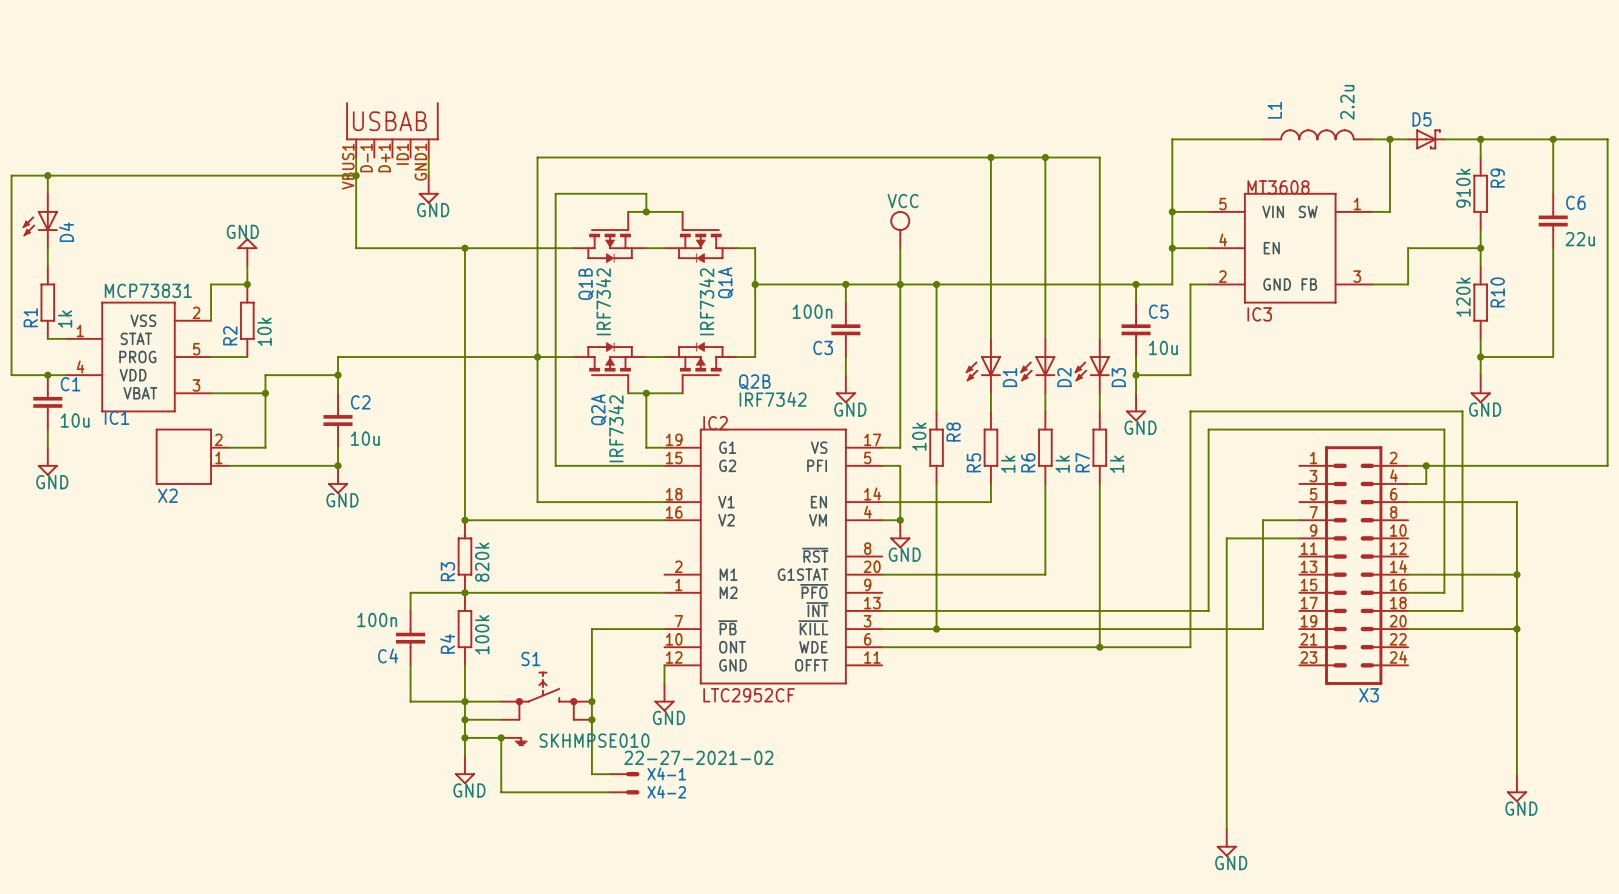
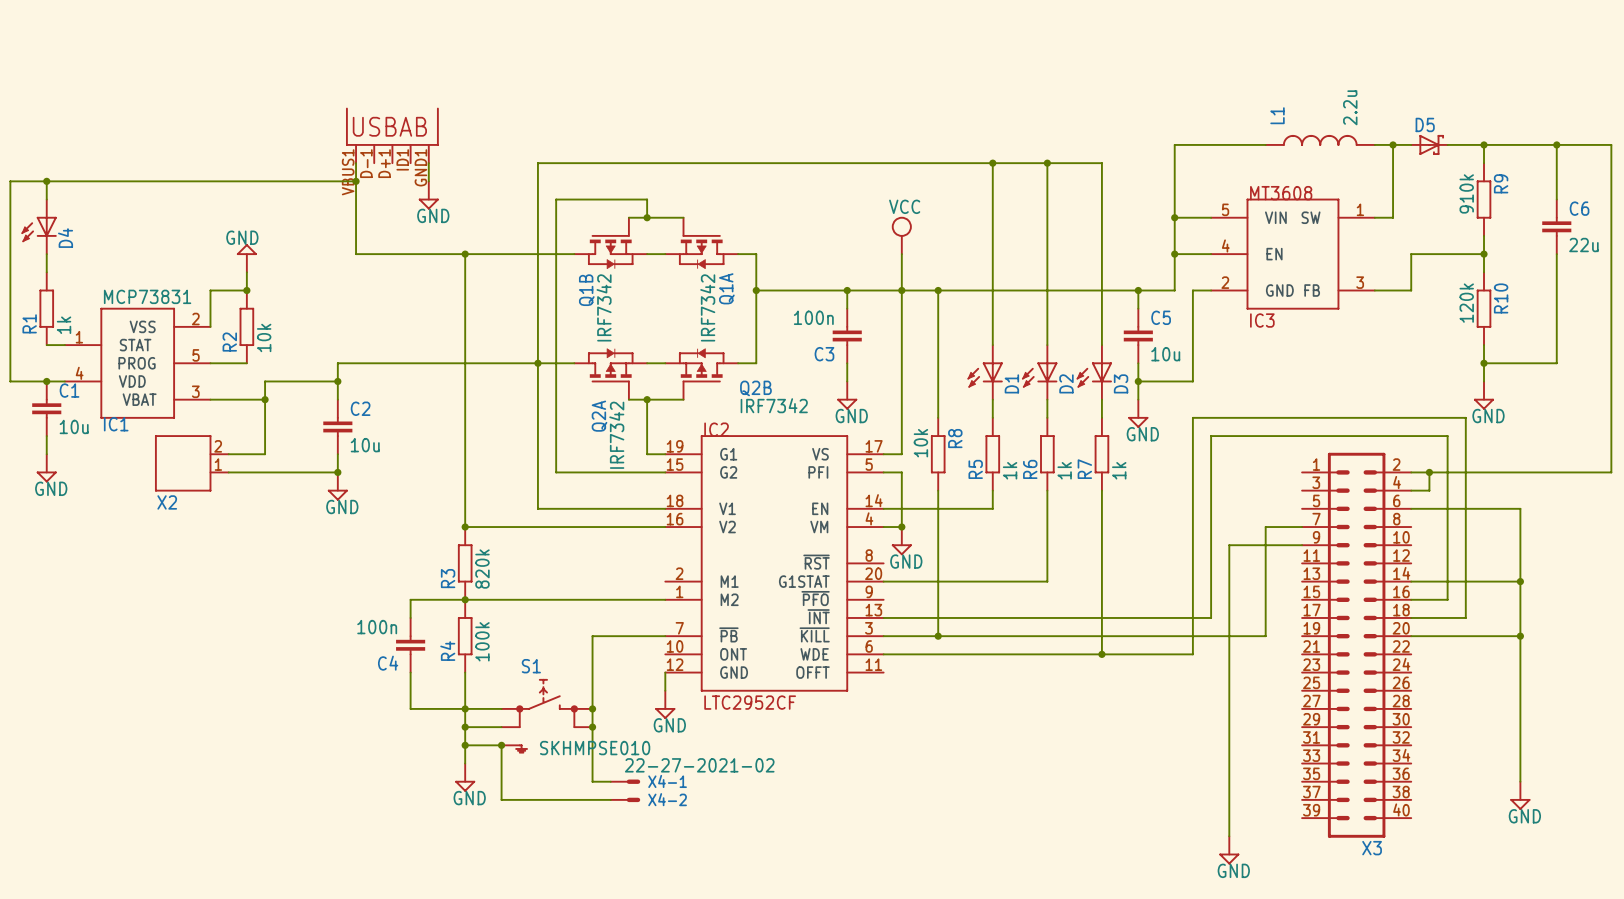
X3 symbol: [1299, 446, 1409, 685] -> [1302, 452, 1412, 838]
X3 name position: X3 (1369, 695) -> X3 (1372, 848)

